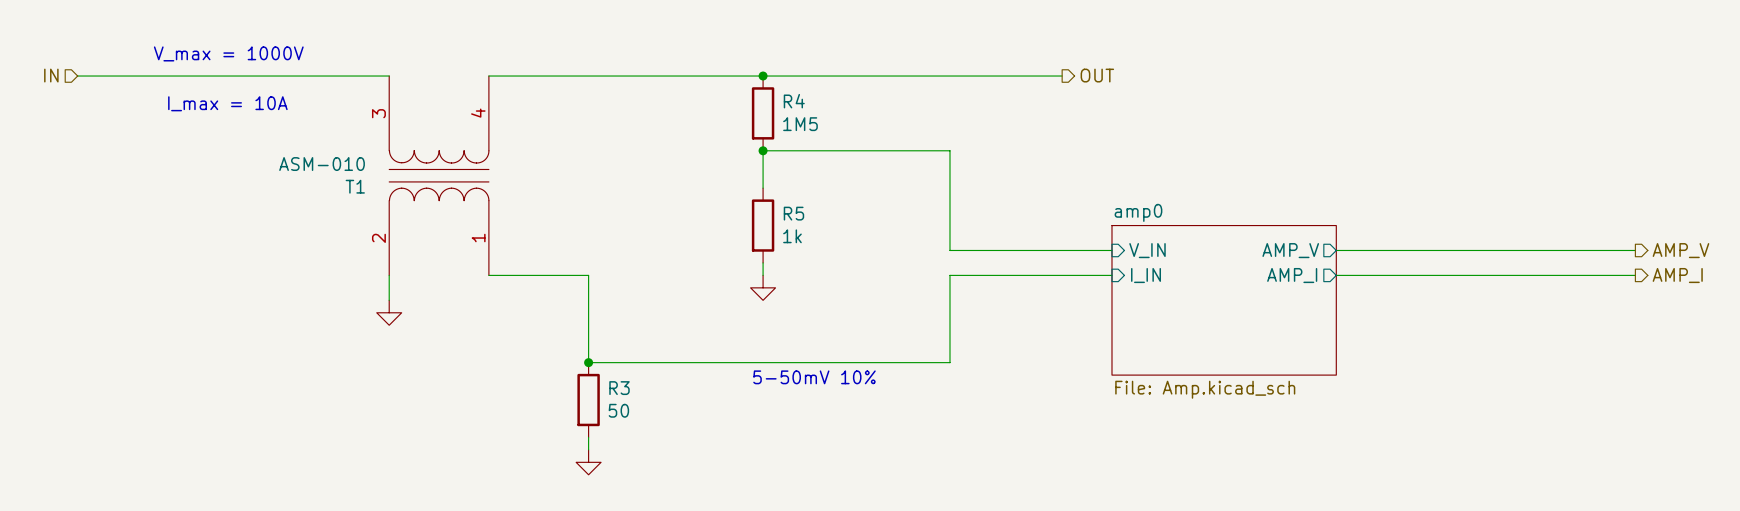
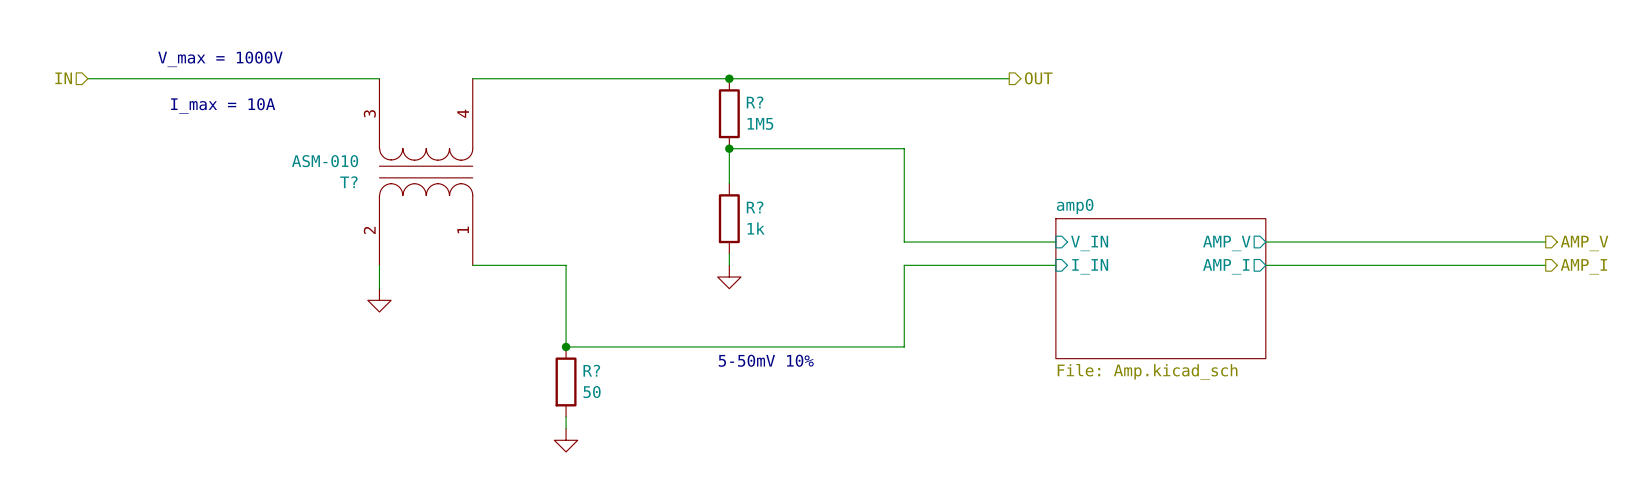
R4 name: R4 (794, 101) -> R? (755, 102)
T1 name: T1 (355, 186) -> T? (348, 182)
R5 name: R5 (793, 213) -> R? (755, 207)
R3 name: R3 (619, 388) -> R? (591, 370)

